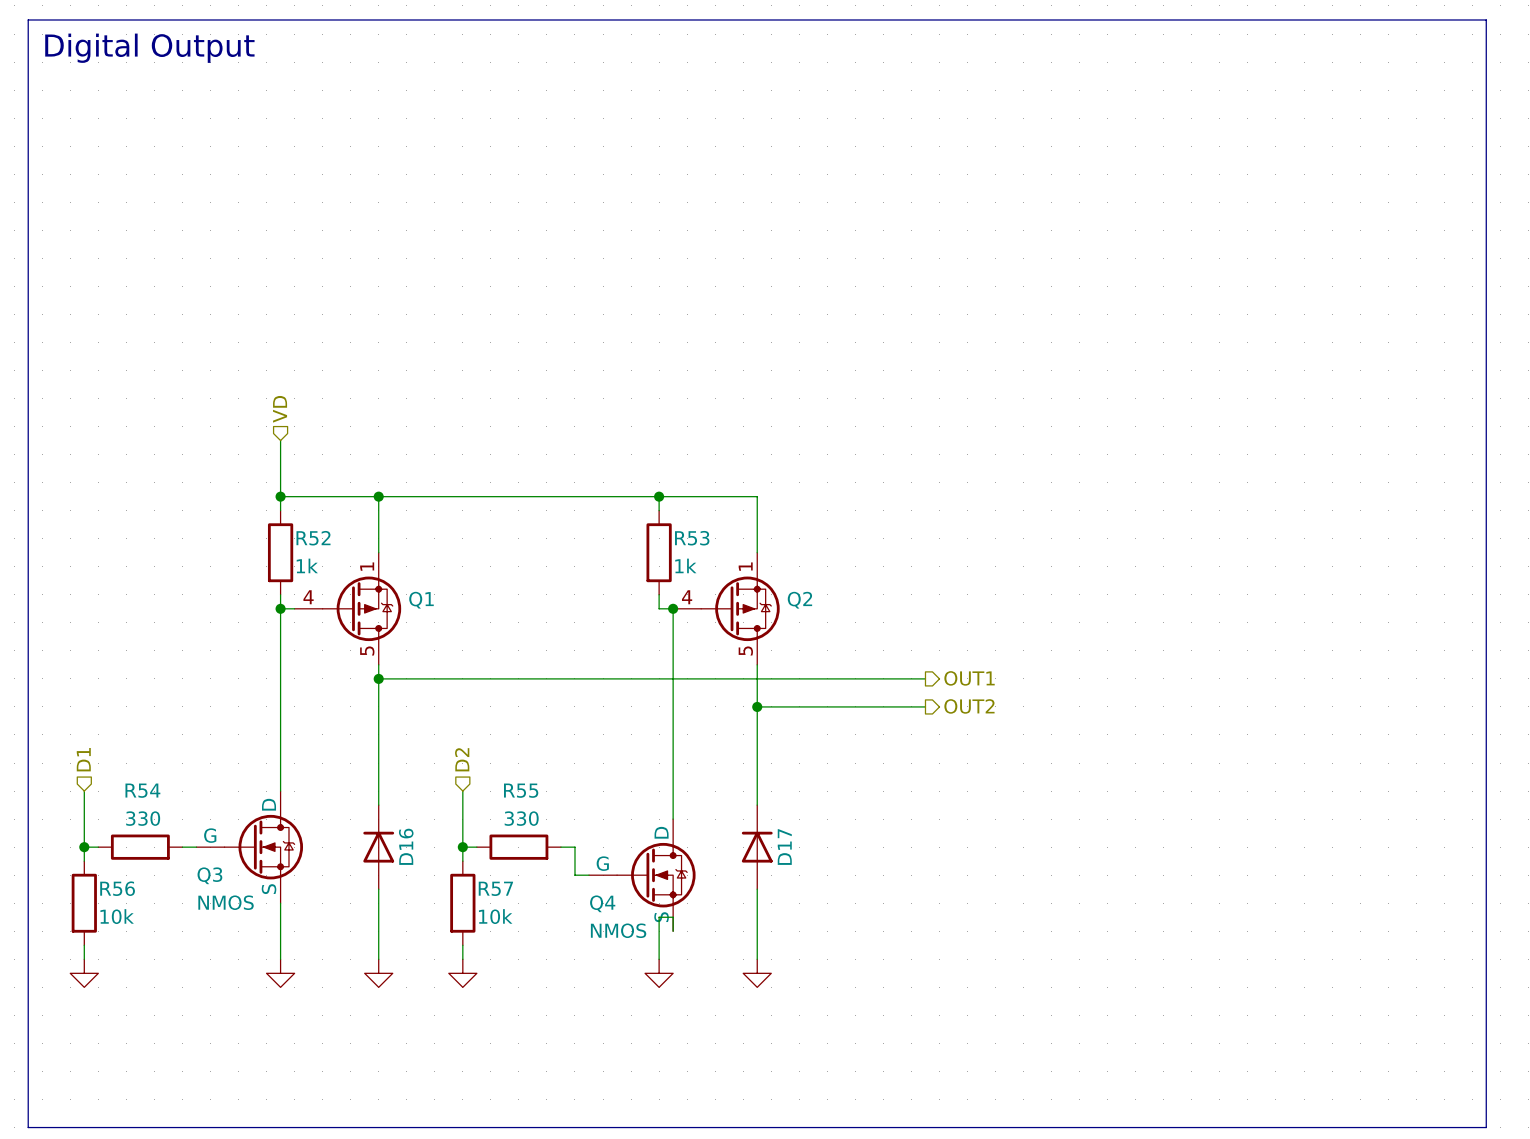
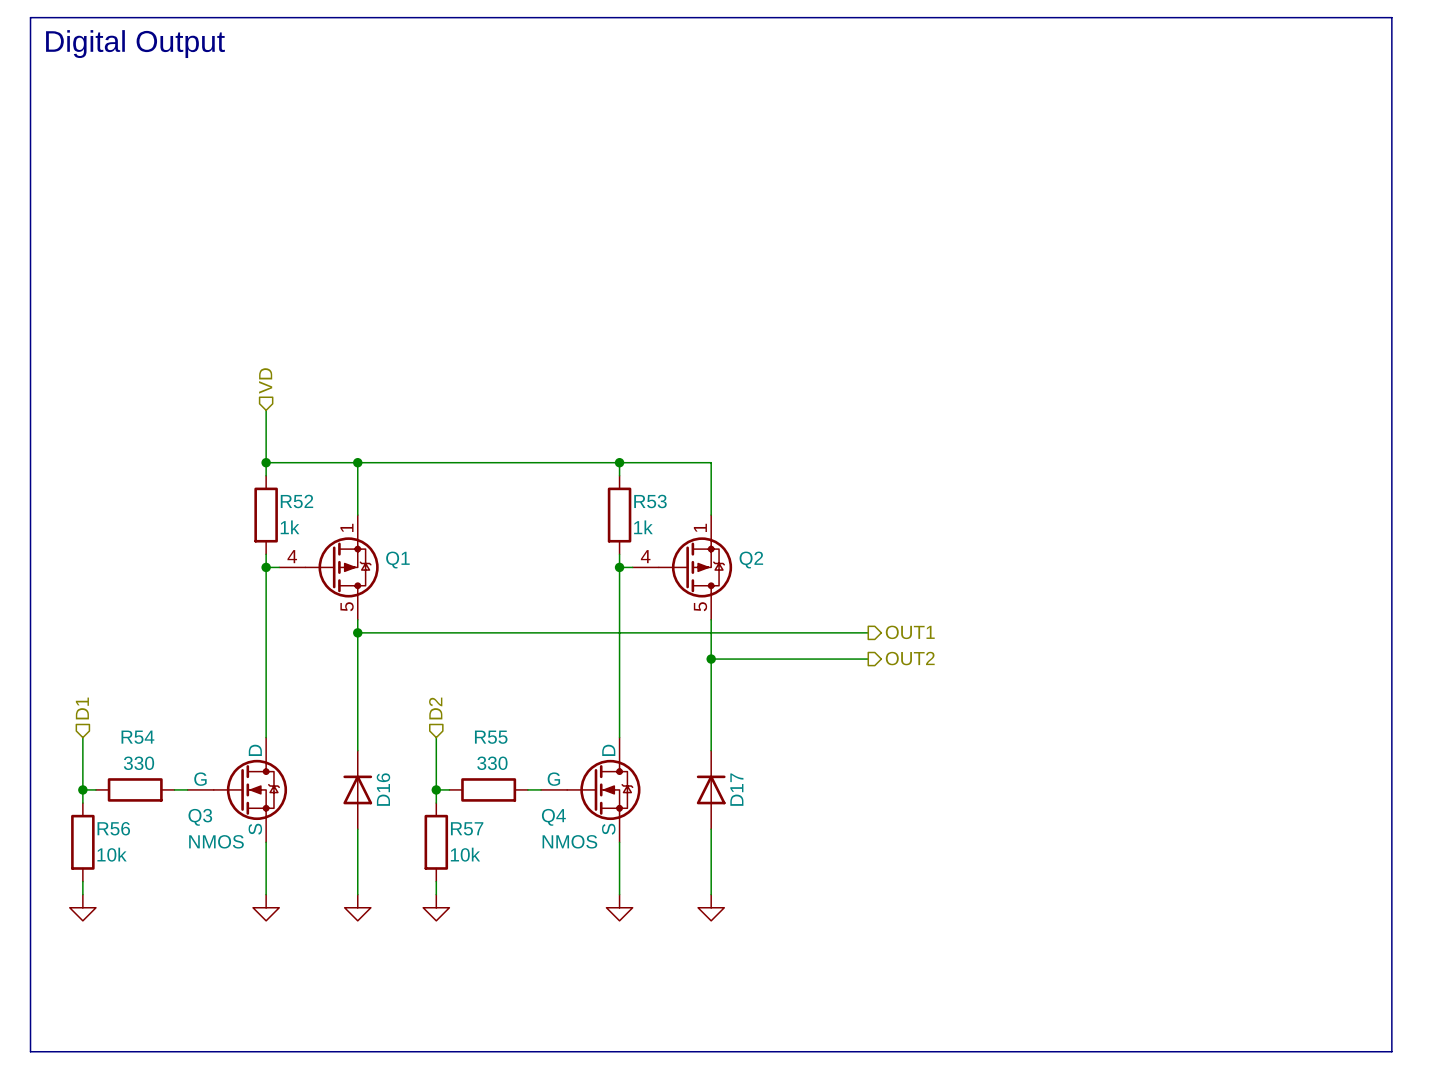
wire: none -> (619, 567) (619, 737)
wire: (673, 608) (673, 819) -> none
junction position: (673, 608) -> (619, 567)
wire: (574, 847) (574, 875) (589, 875) -> none
Q4 position: (642, 875) -> (590, 789)
wire: (659, 917) (673, 917) (673, 931) -> (619, 855) (619, 842)

